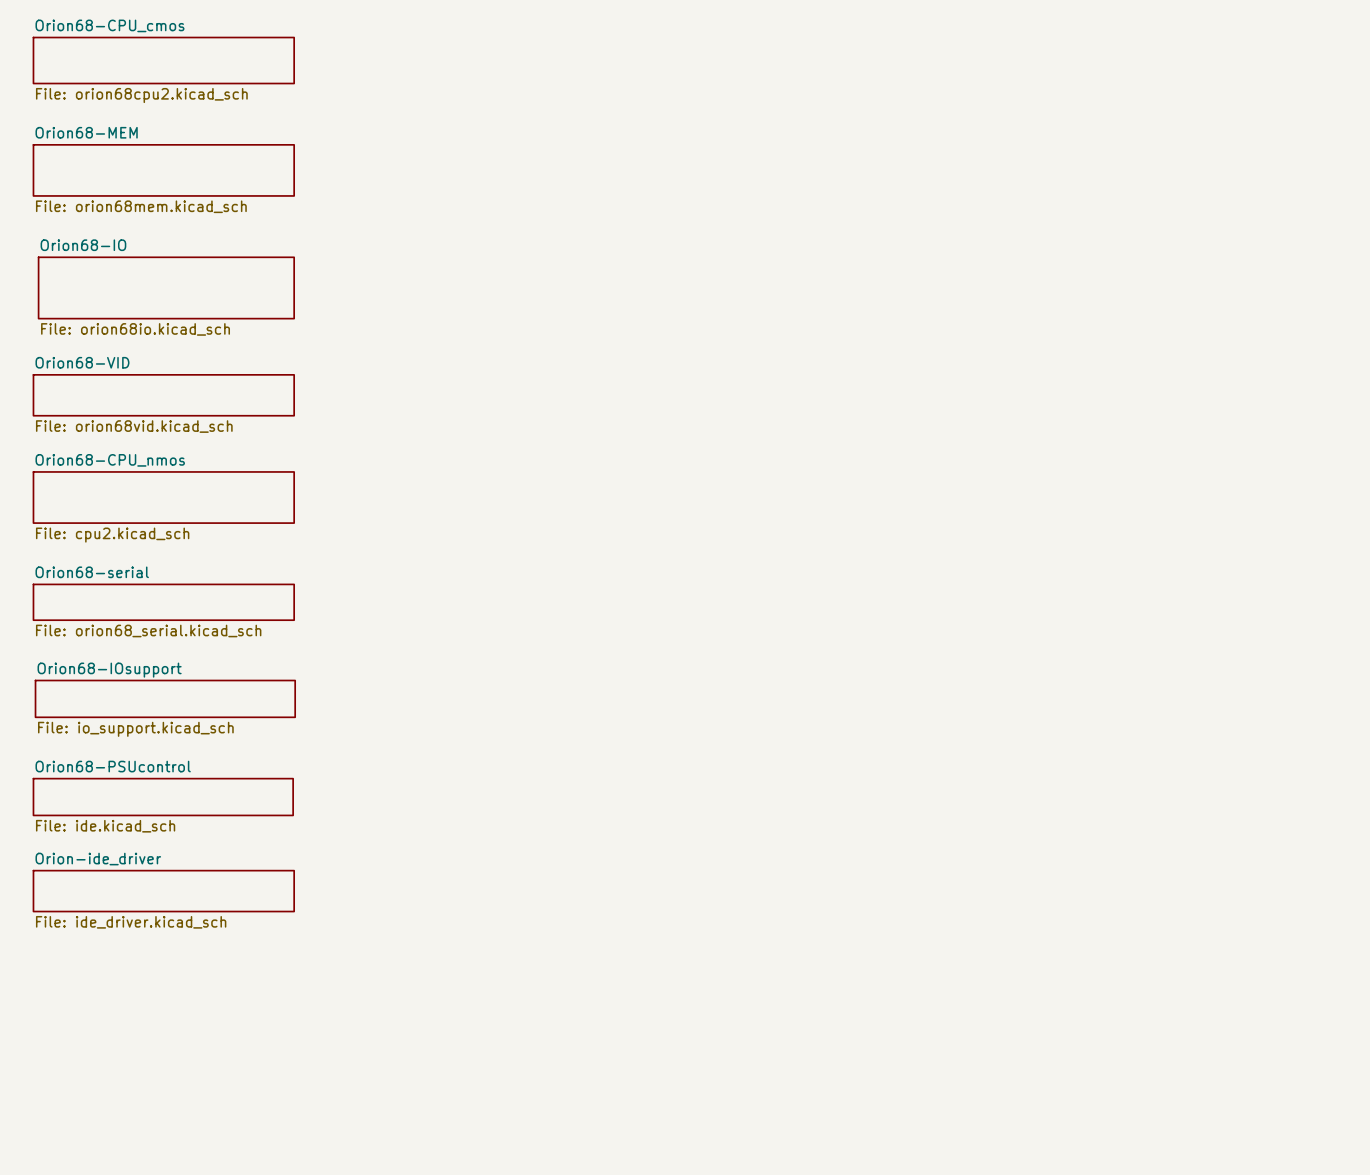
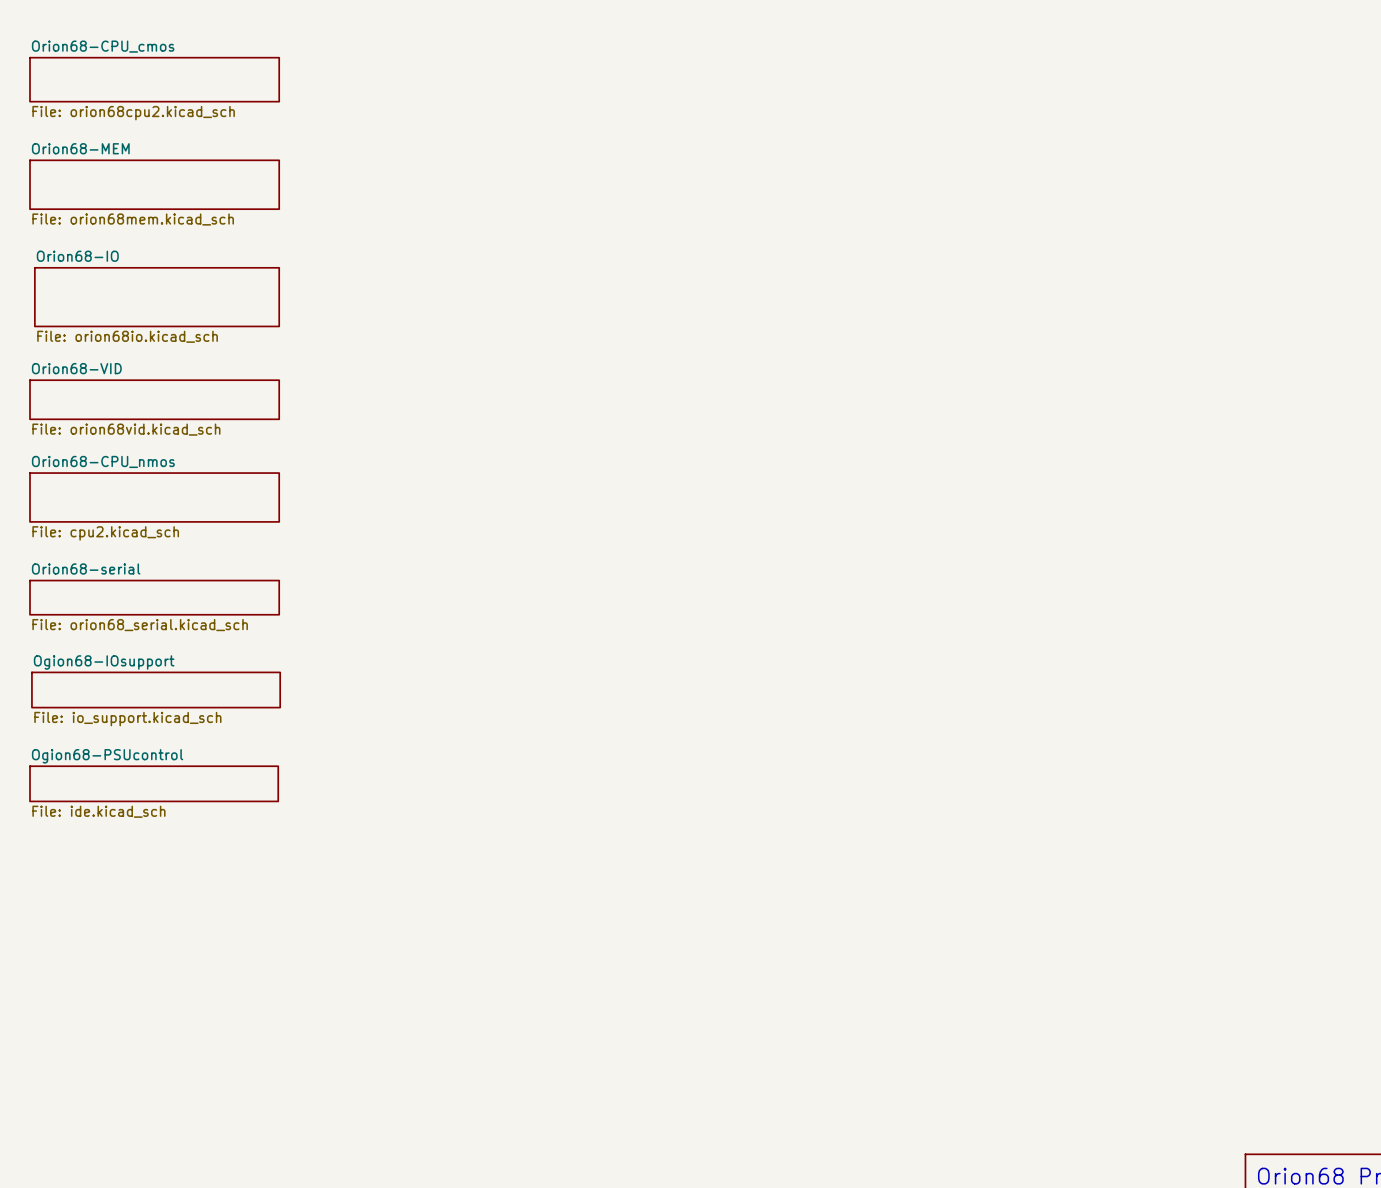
sheet Orion68-IOsupport name: Orion68-IOsupport (109, 670) -> Ogion68-IOsupport (104, 662)
sheet Orion68-PSUcontrol name: Orion68-PSUcontrol (113, 766) -> Ogion68-PSUcontrol (107, 756)
sheet Orion-ide_driver: File: ide_driver.kicad_sch (163, 891) -> none

